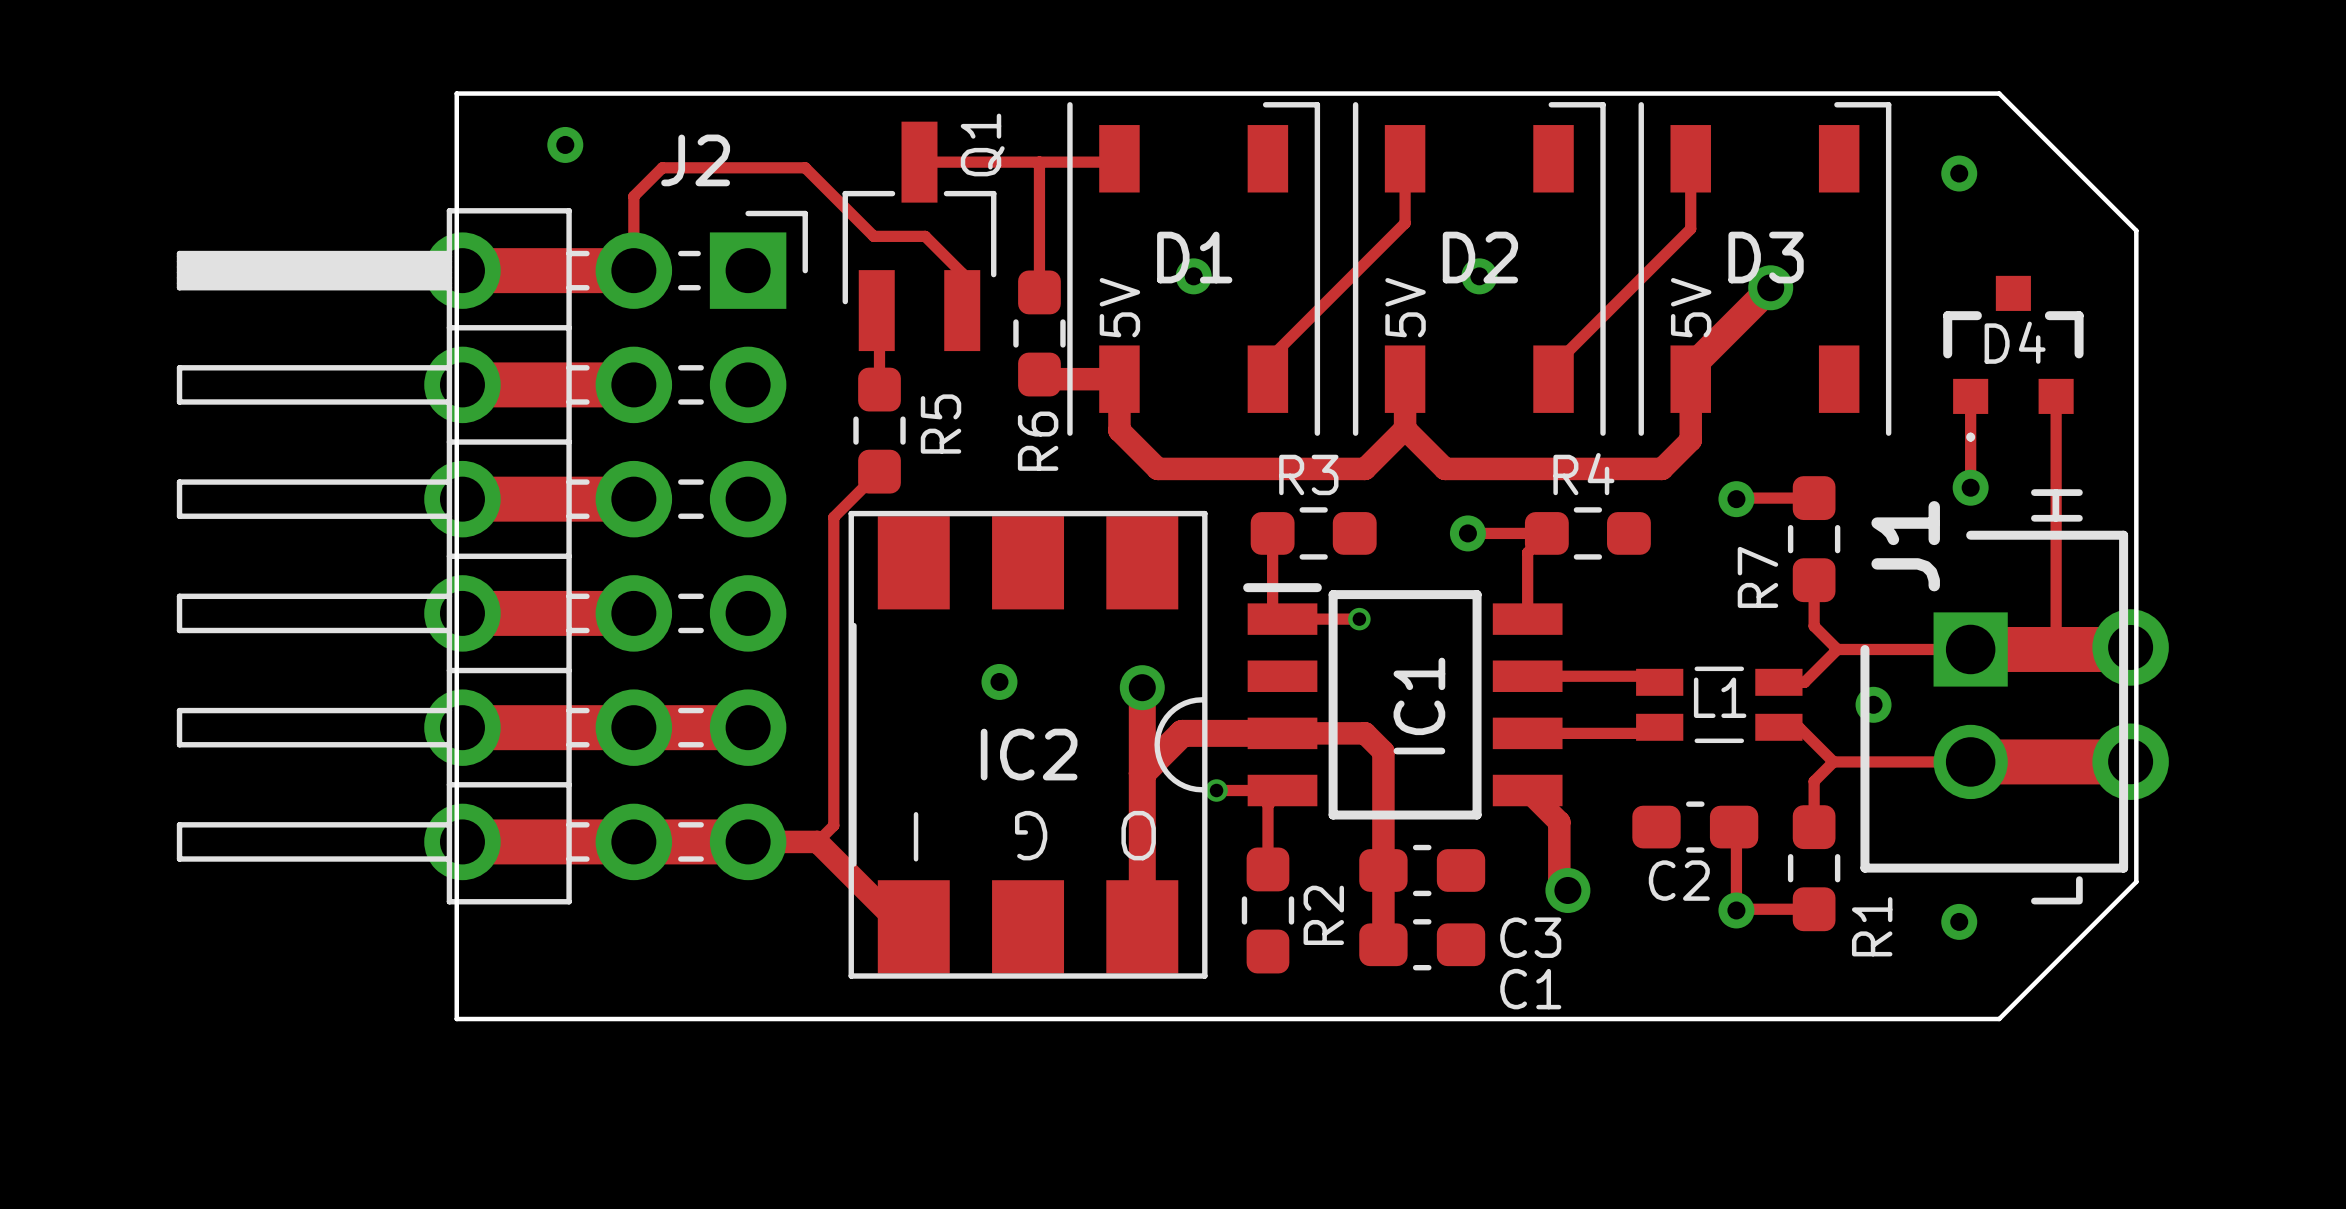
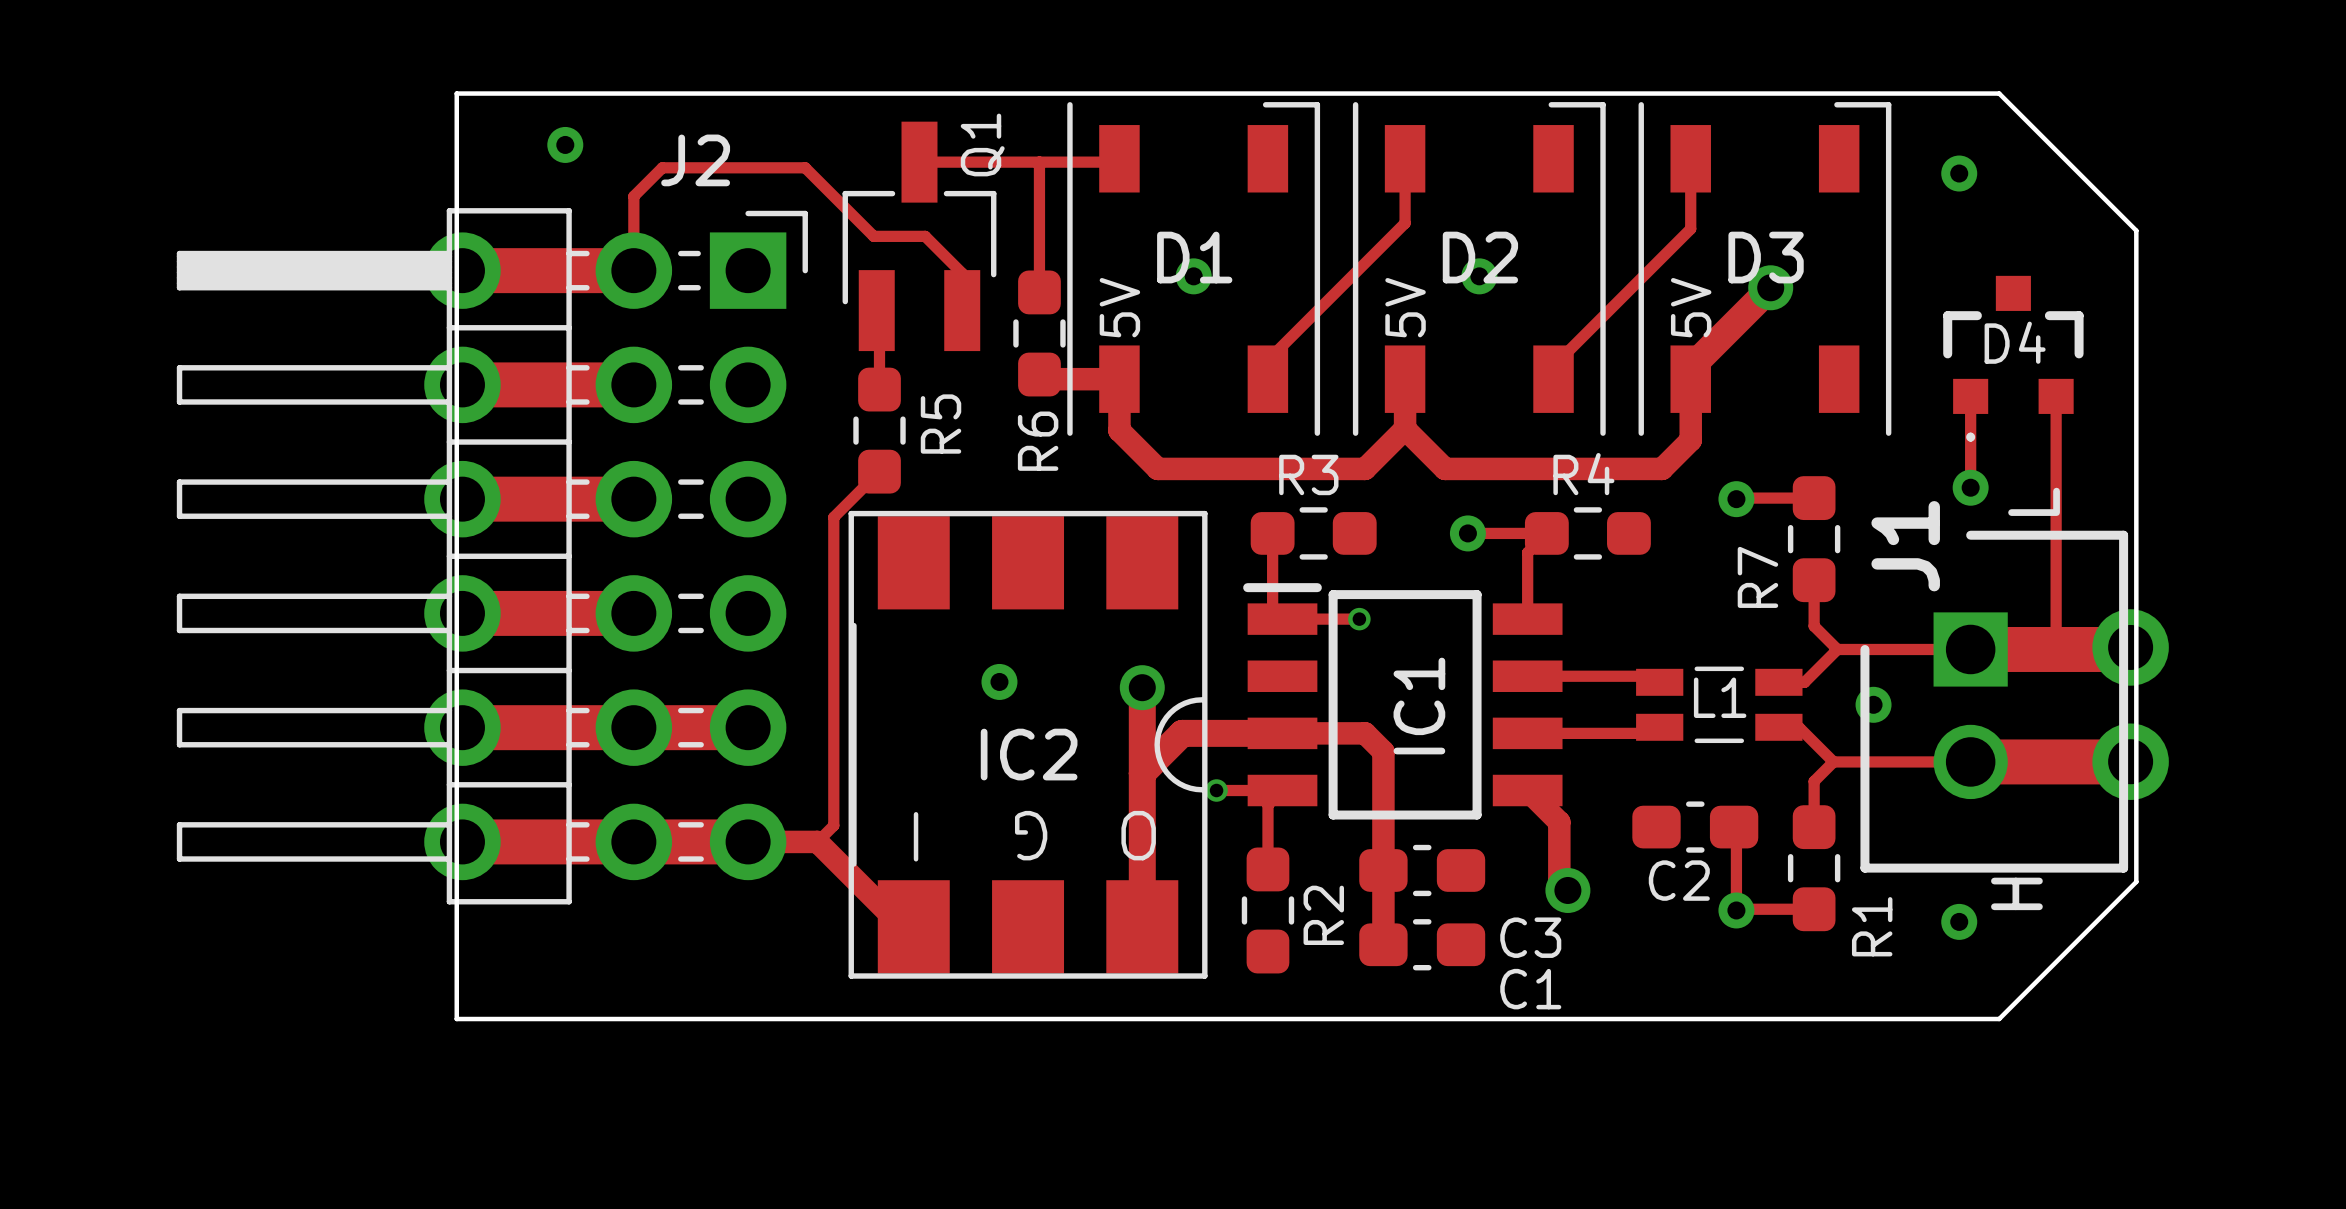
text position: H (2056, 505) -> H (2016, 893)
text position: L (2056, 890) -> L (2034, 501)

